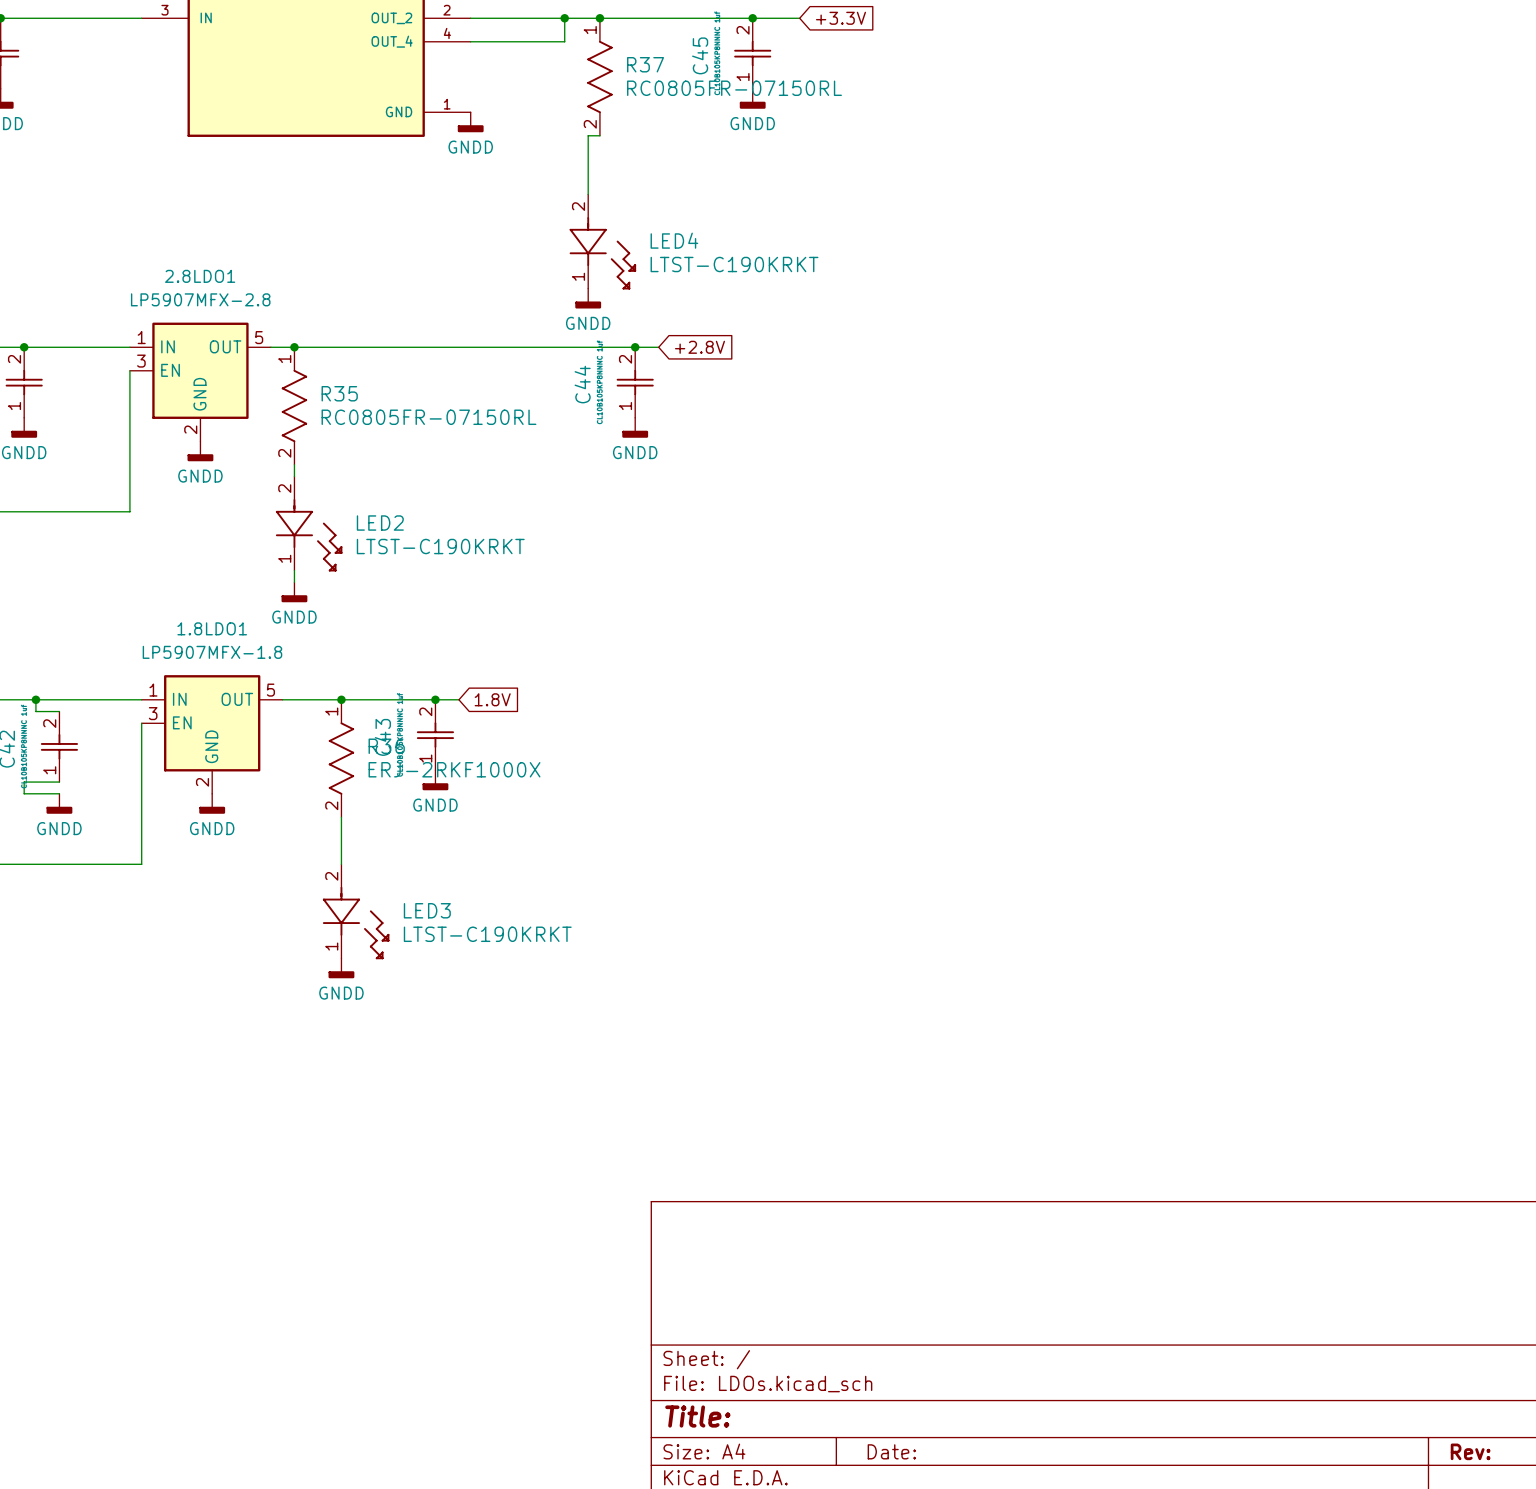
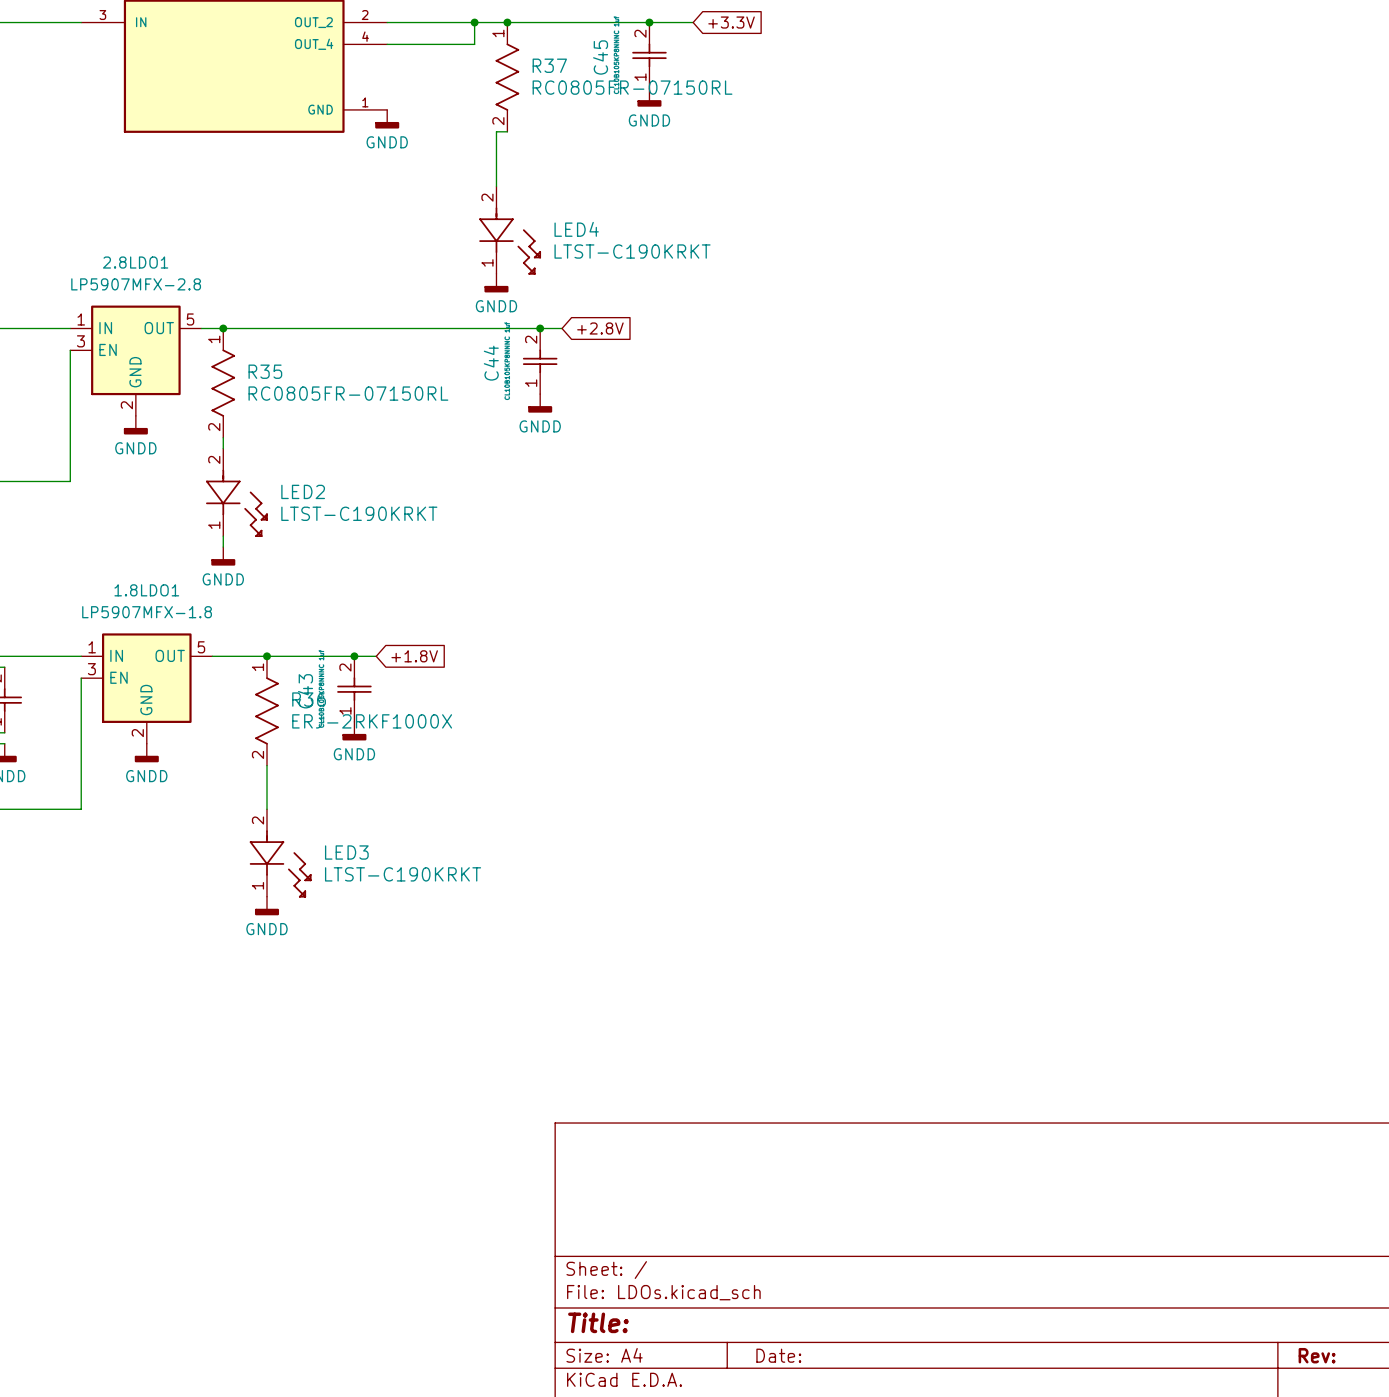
global label: 1.8V (492, 699) -> +1.8V (414, 656)

